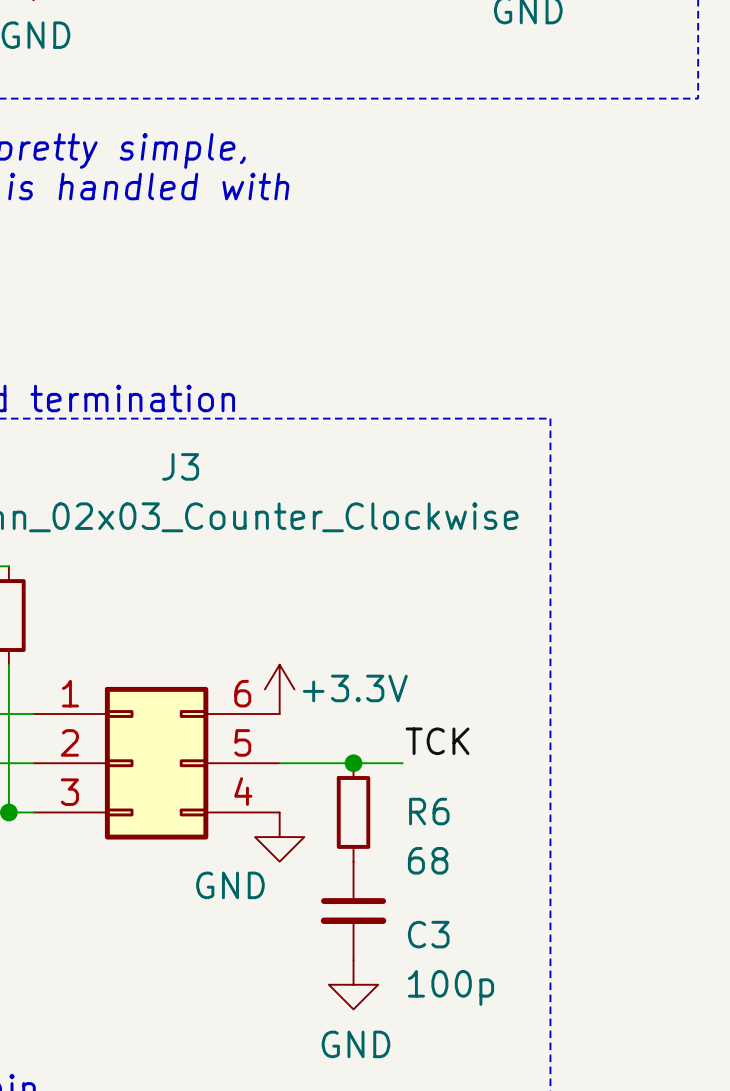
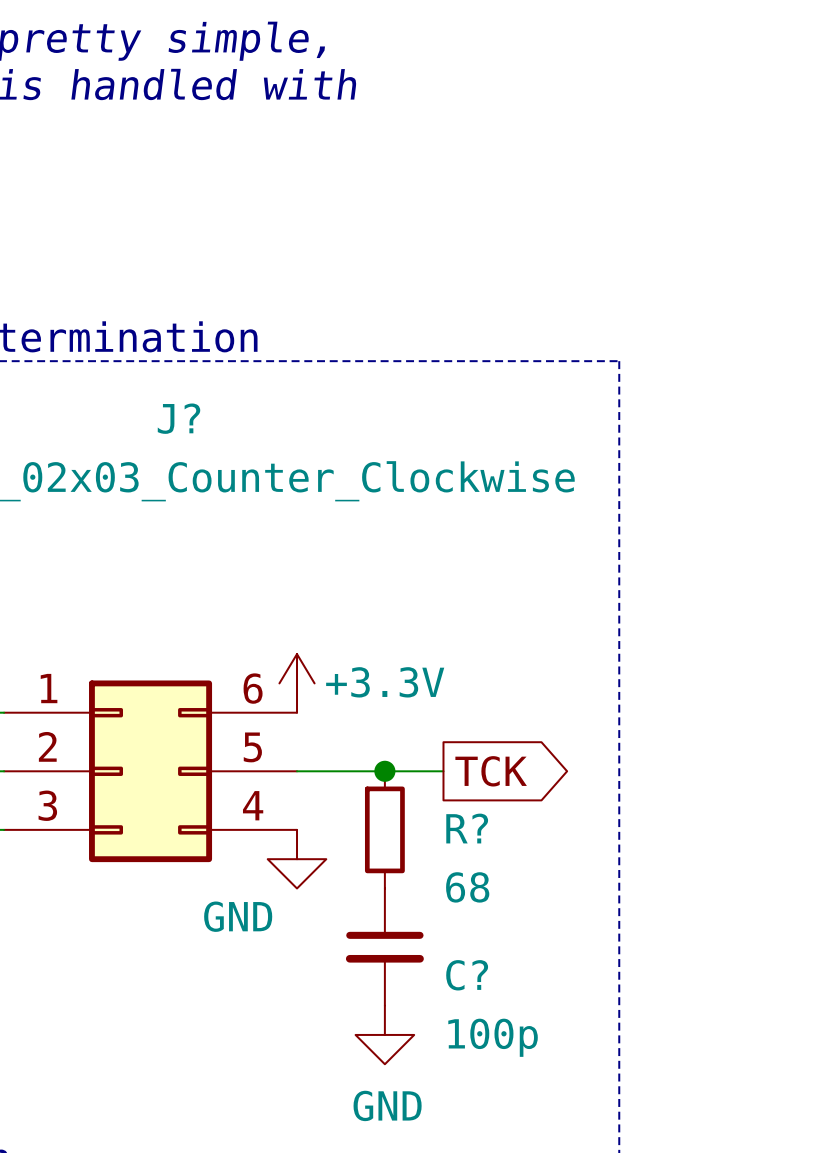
J3 name: J3 (180, 466) -> J? (179, 418)
label: TCK (437, 741) -> none
global label: none -> TCK (491, 771)
R6 name: R6 (429, 811) -> R? (467, 828)
C3 name: C3 (428, 934) -> C? (467, 975)

